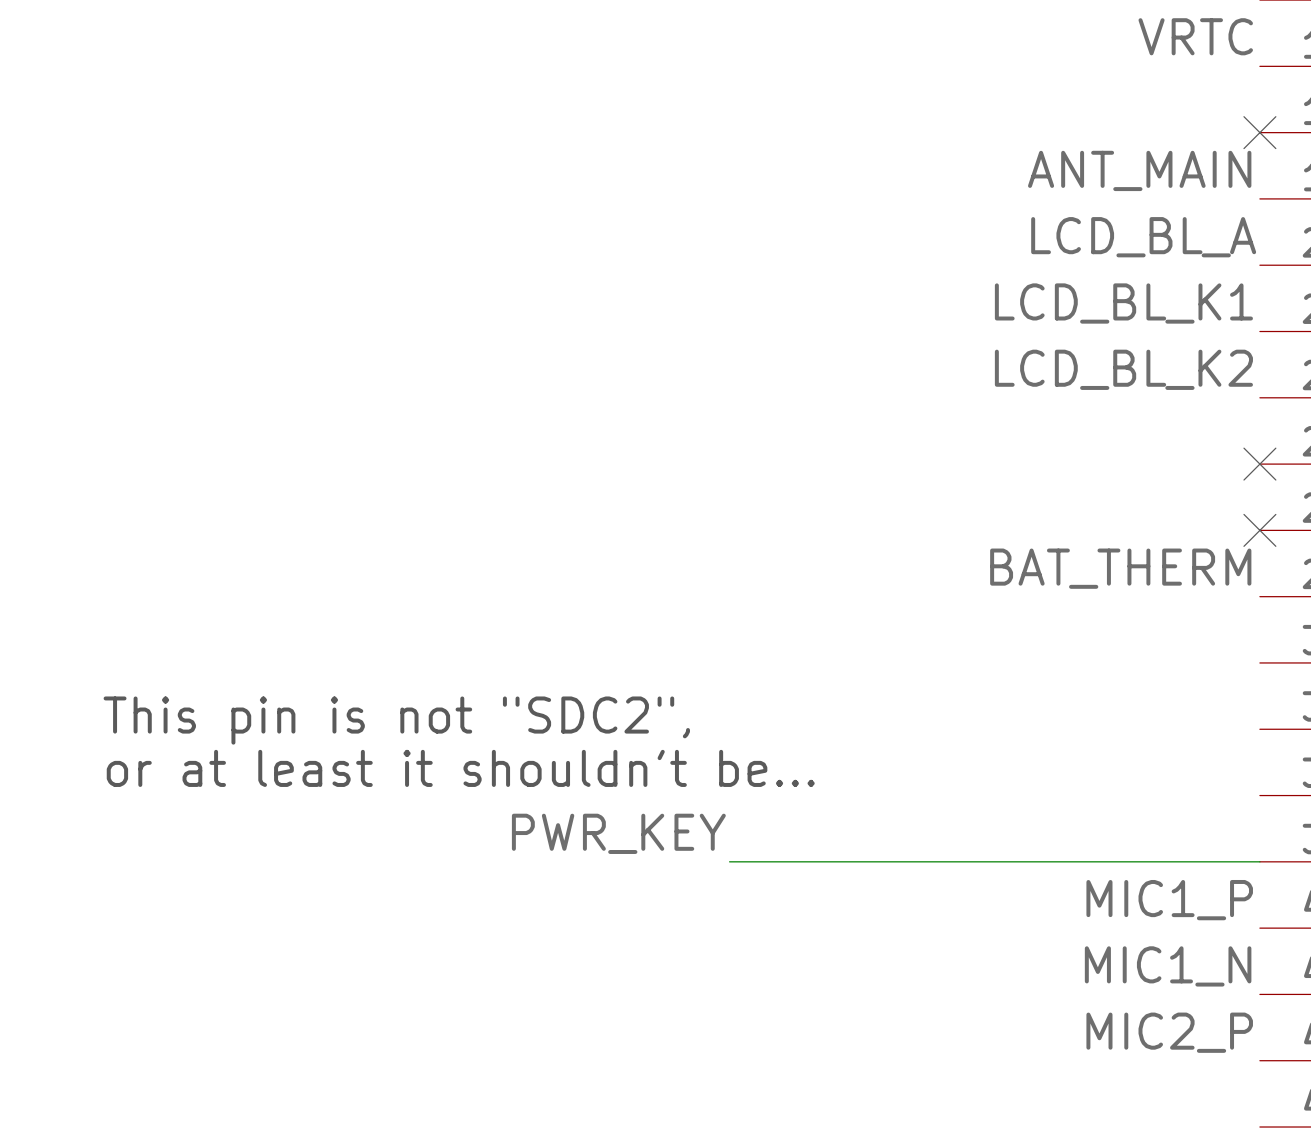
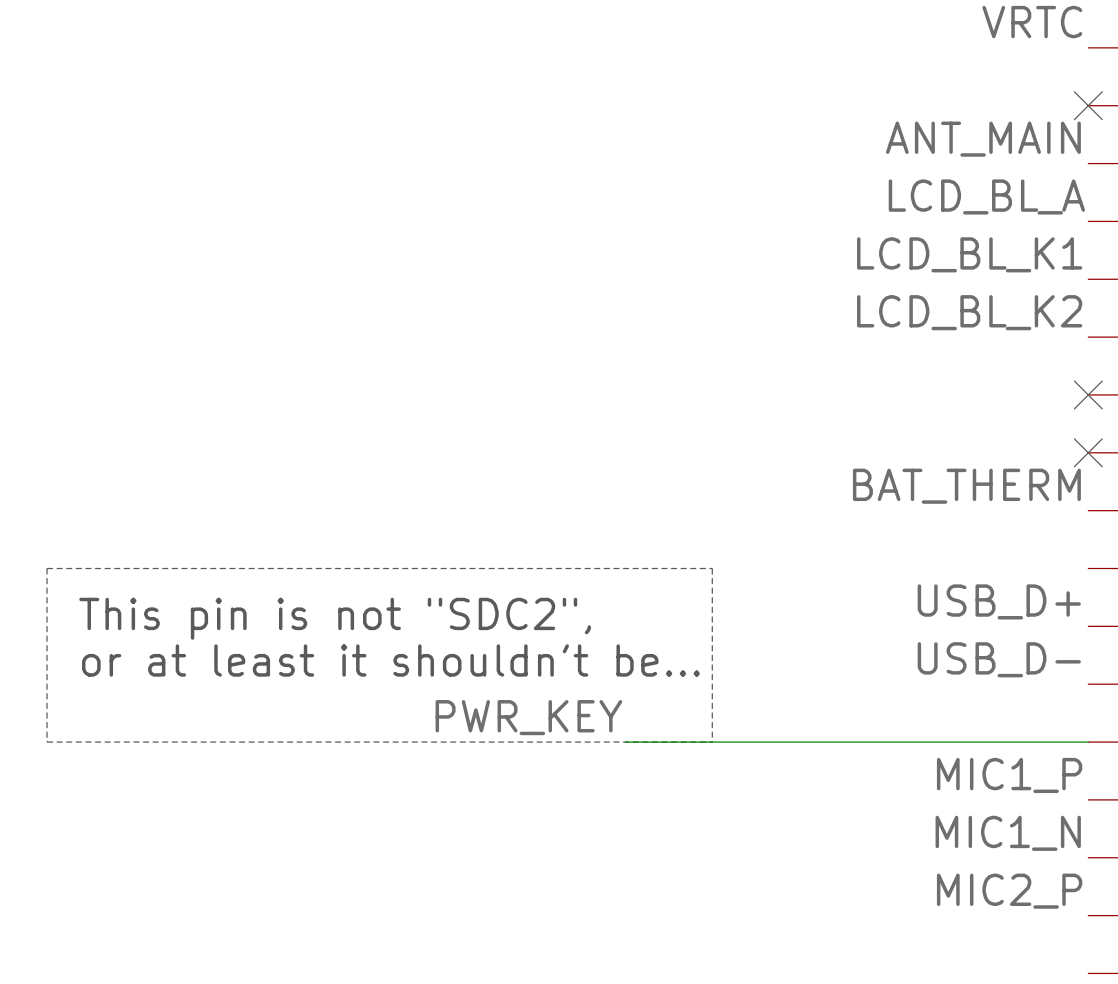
line: none -> (47, 568) (712, 568) (712, 742) (47, 742) (47, 568)
label: none -> USB_D+ (999, 601)
label: none -> USB_D- (999, 659)

